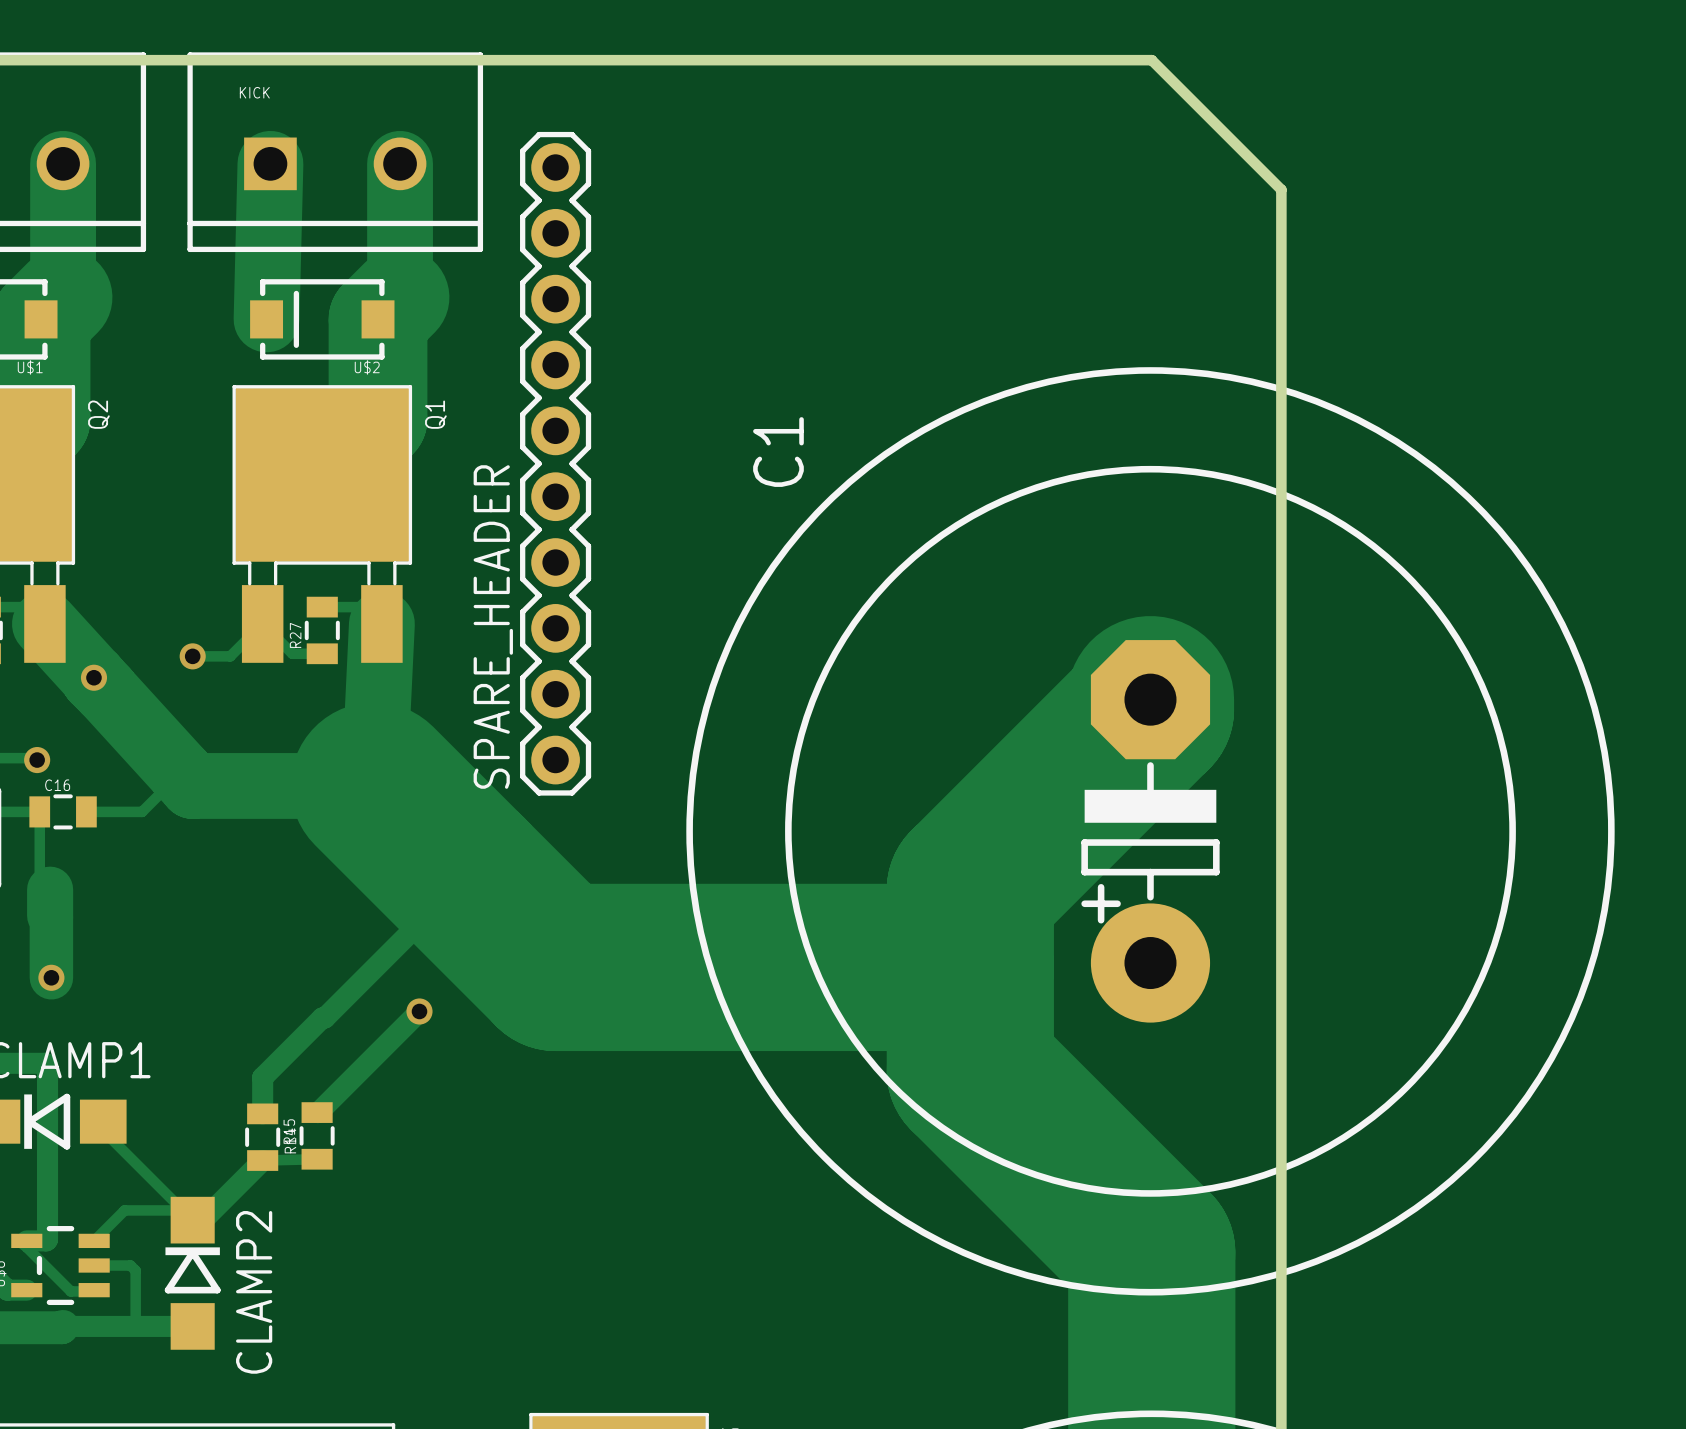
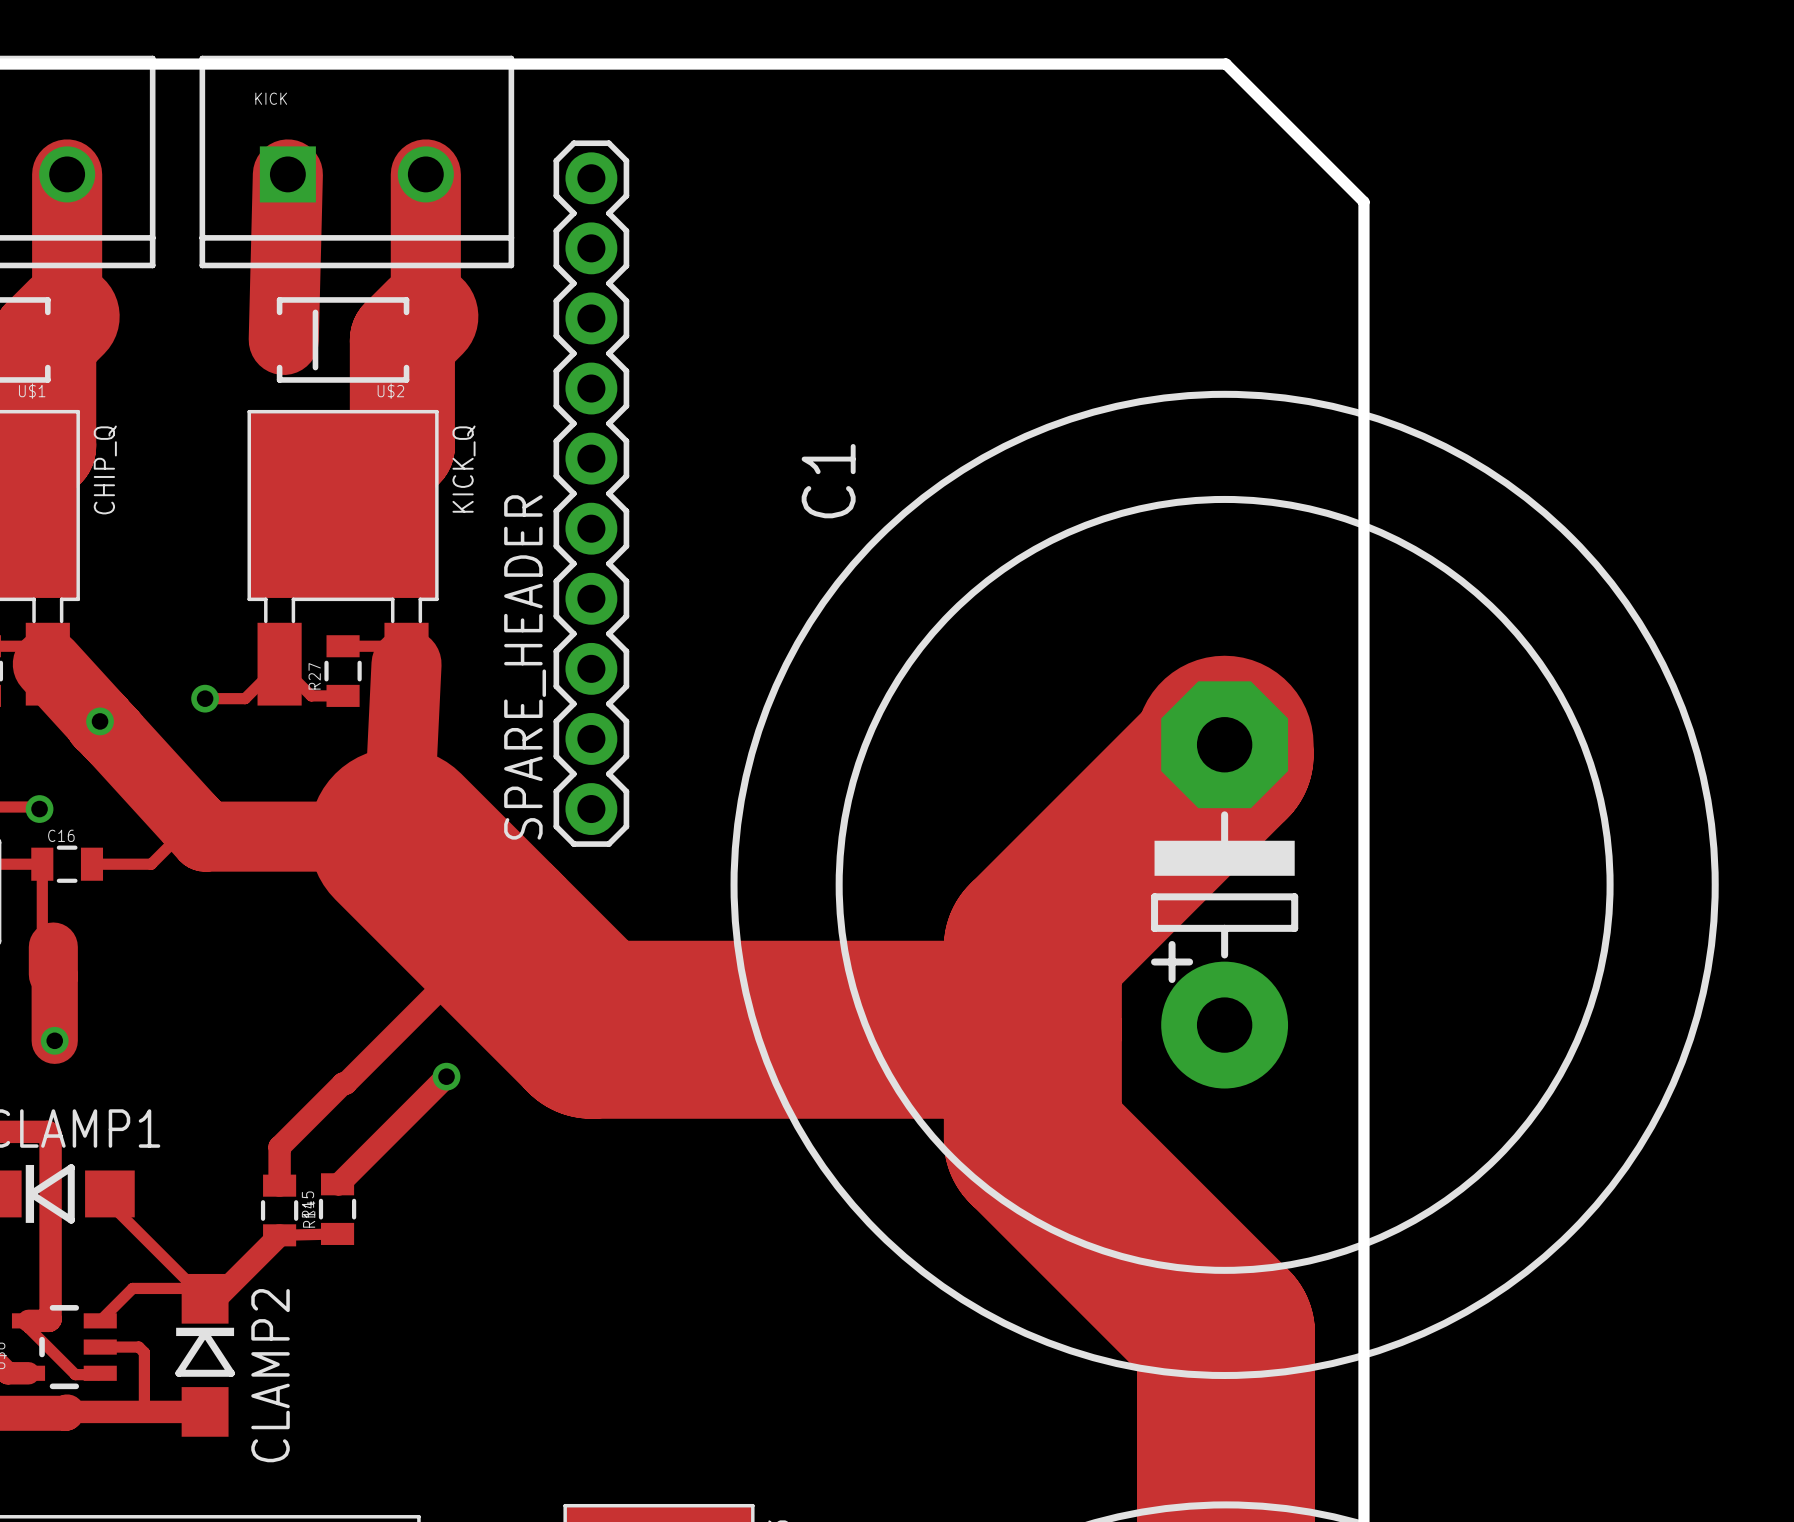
Q2 name: Q2 (98, 414) -> CHIP_Q (105, 469)
Q1 name: Q1 (435, 414) -> KICK_Q (464, 469)

